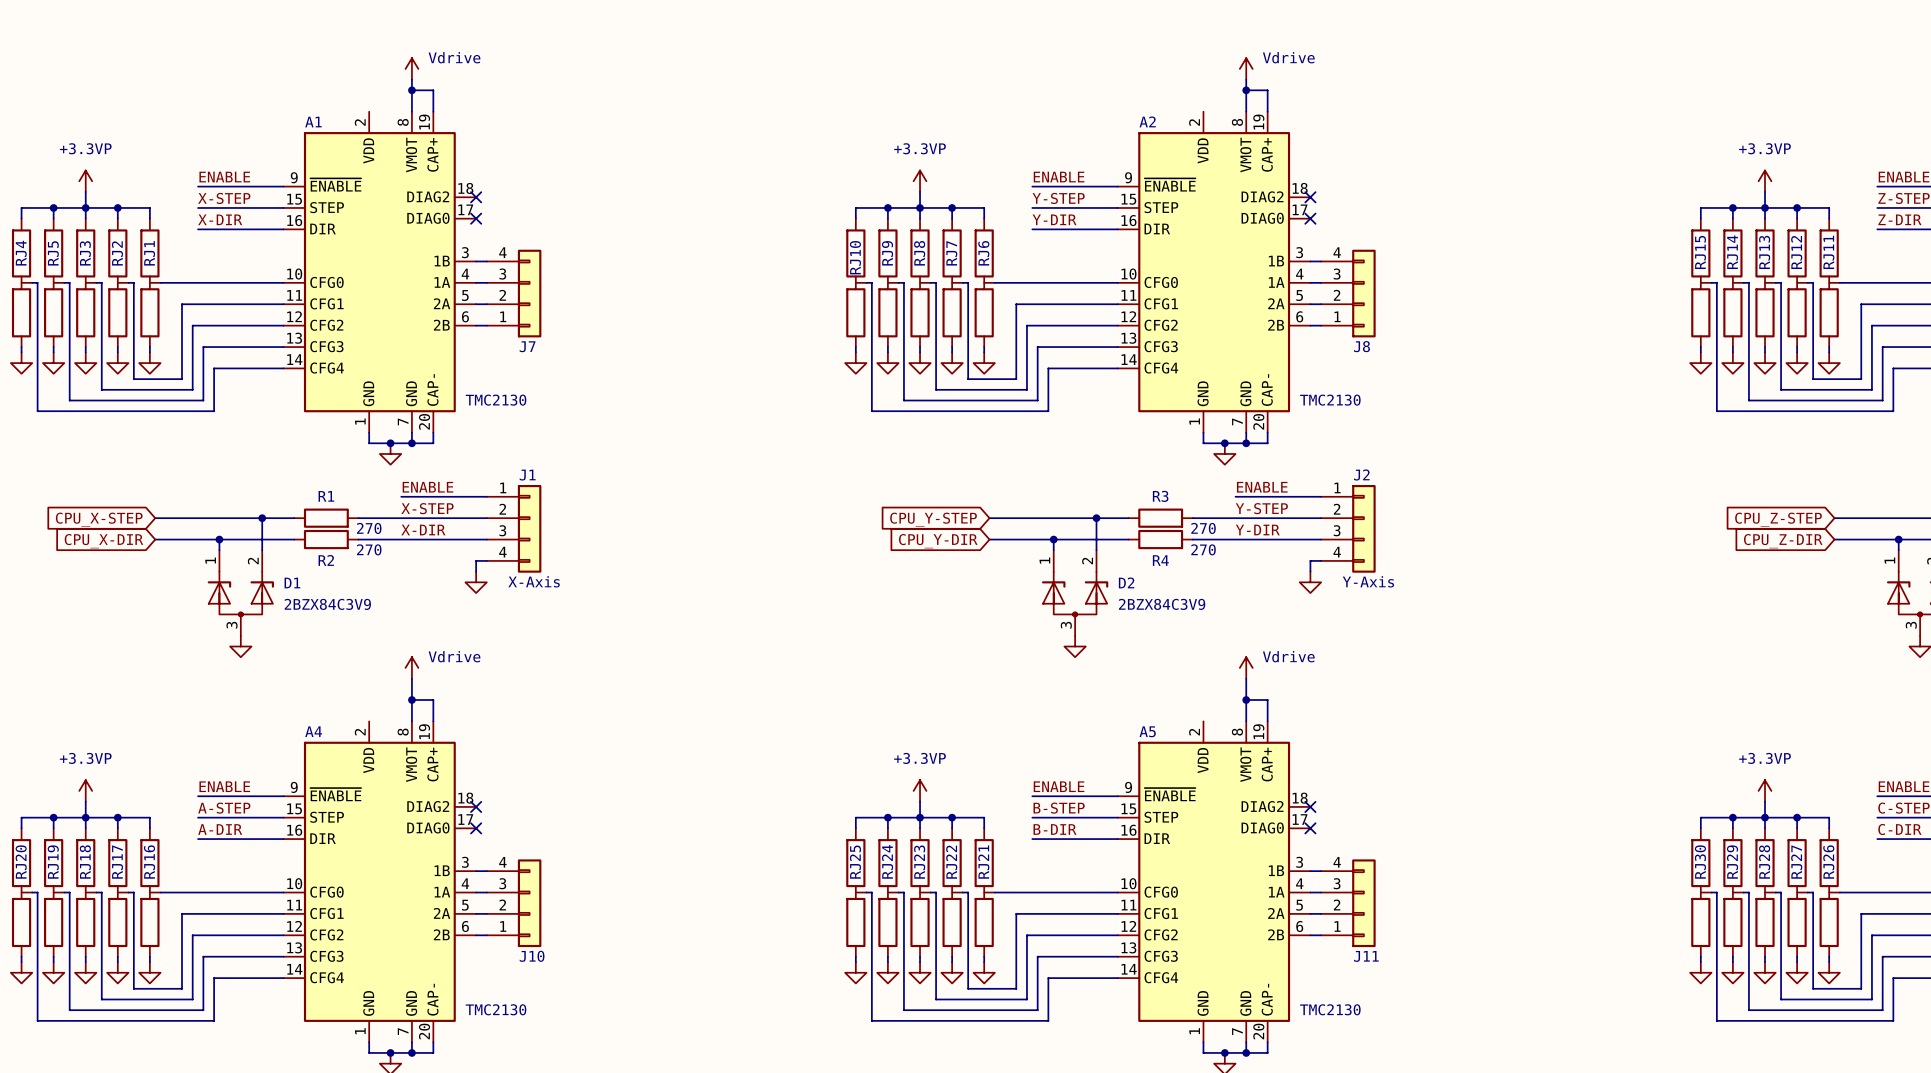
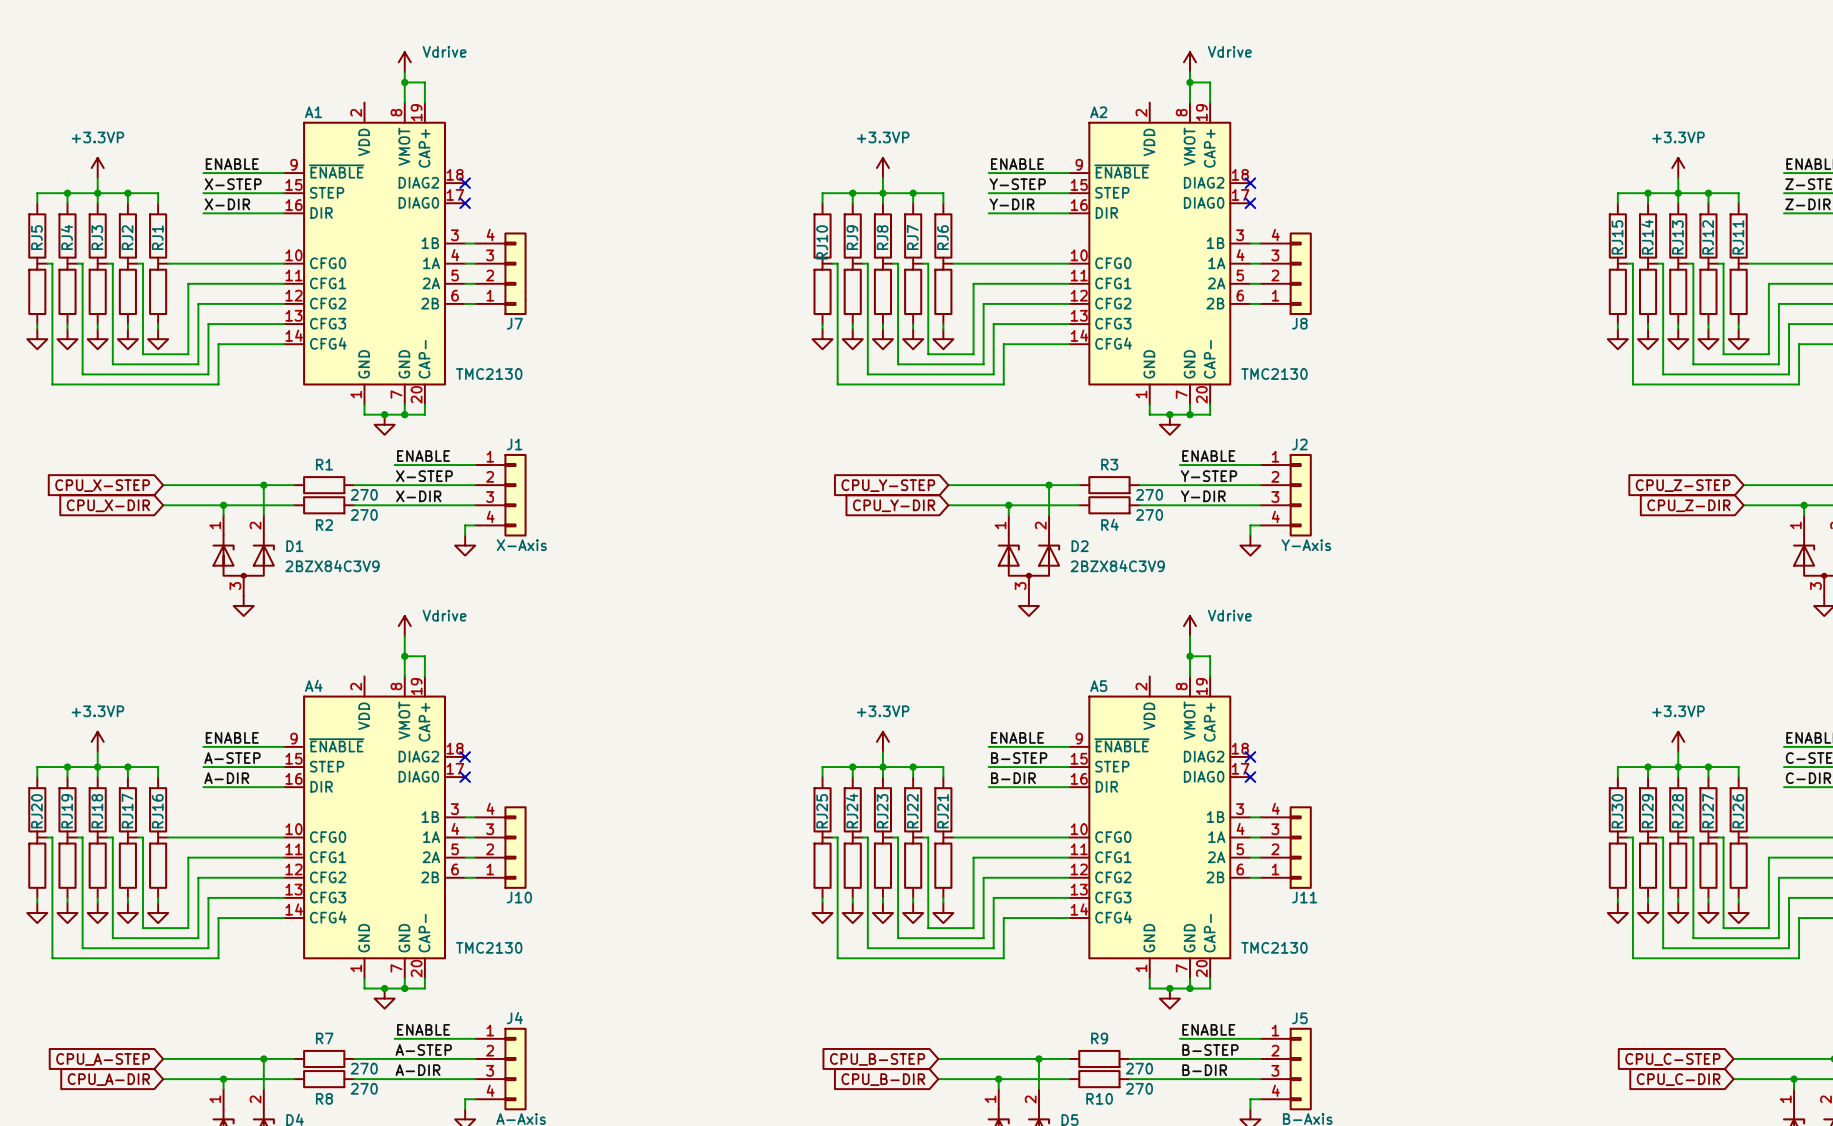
RJ4 name: RJ4 (21, 253) -> RJ5 (36, 237)
RJ5 name: RJ5 (53, 253) -> RJ4 (66, 237)

